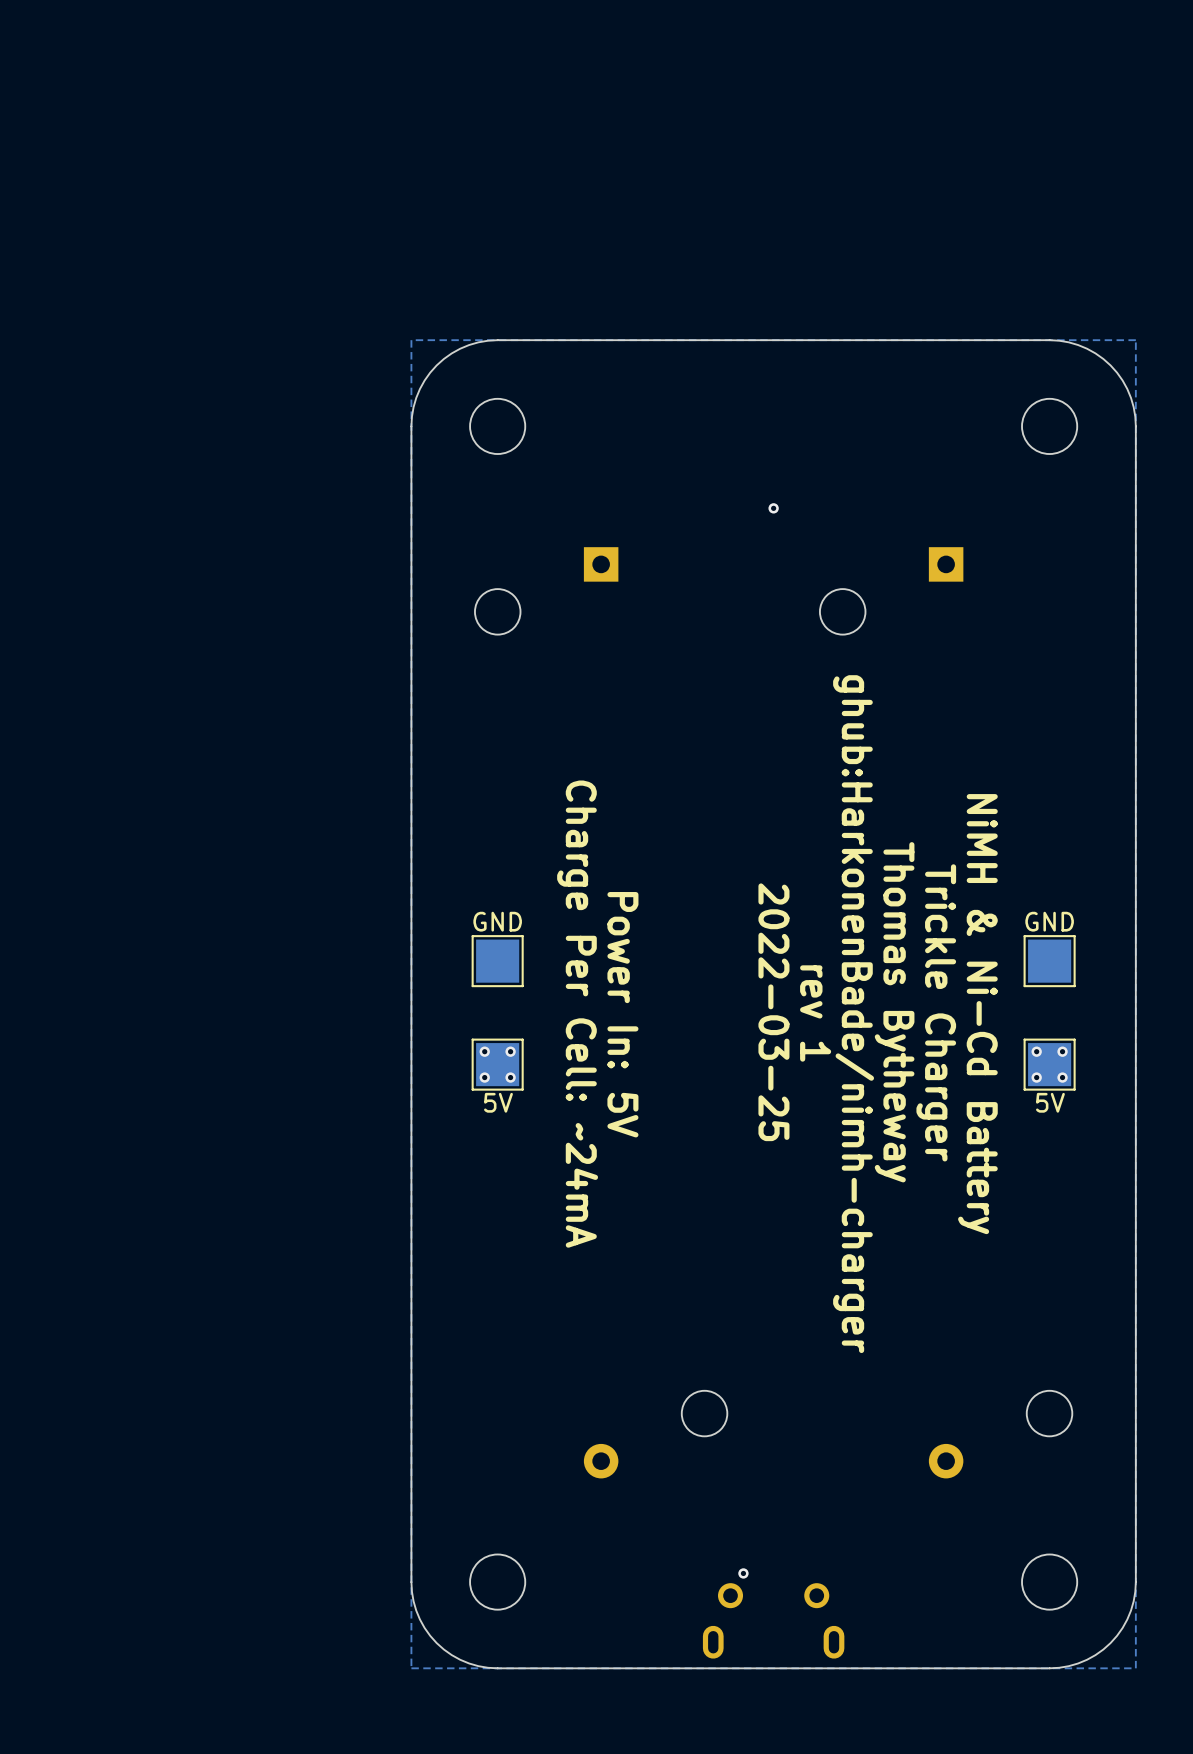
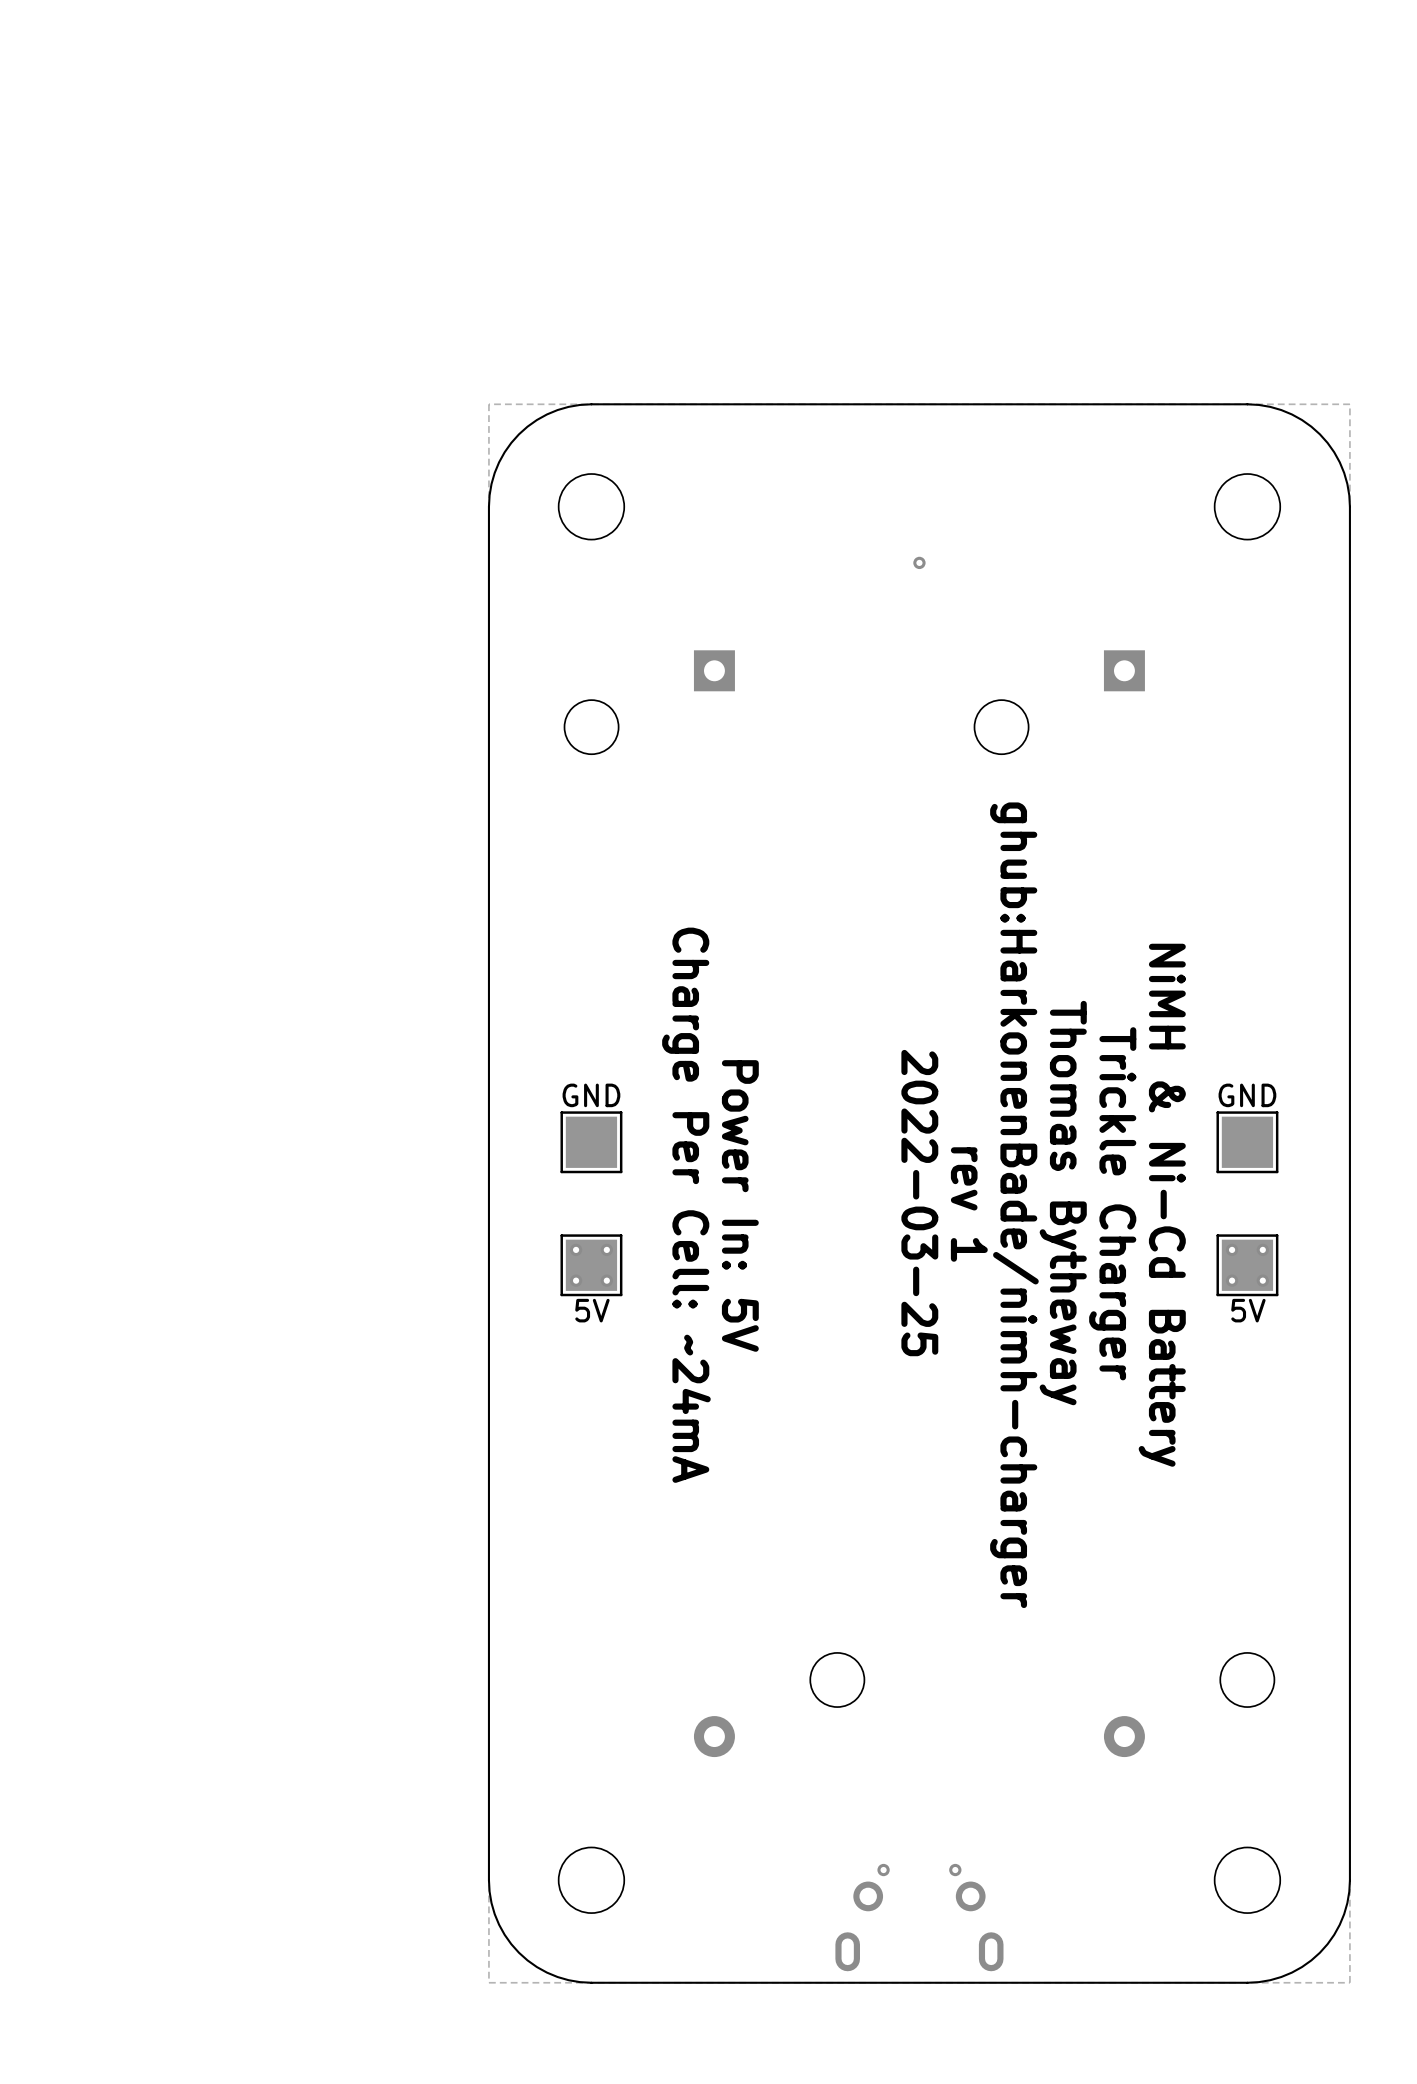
via position: (773, 508) -> (919, 562)
via: none -> (955, 1870)

